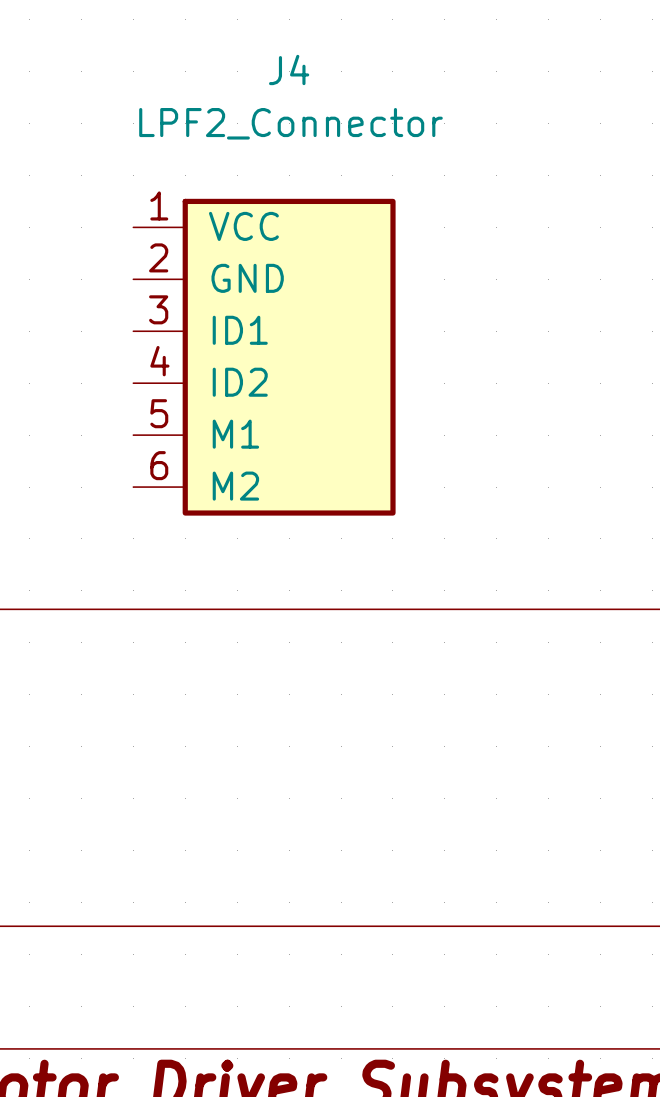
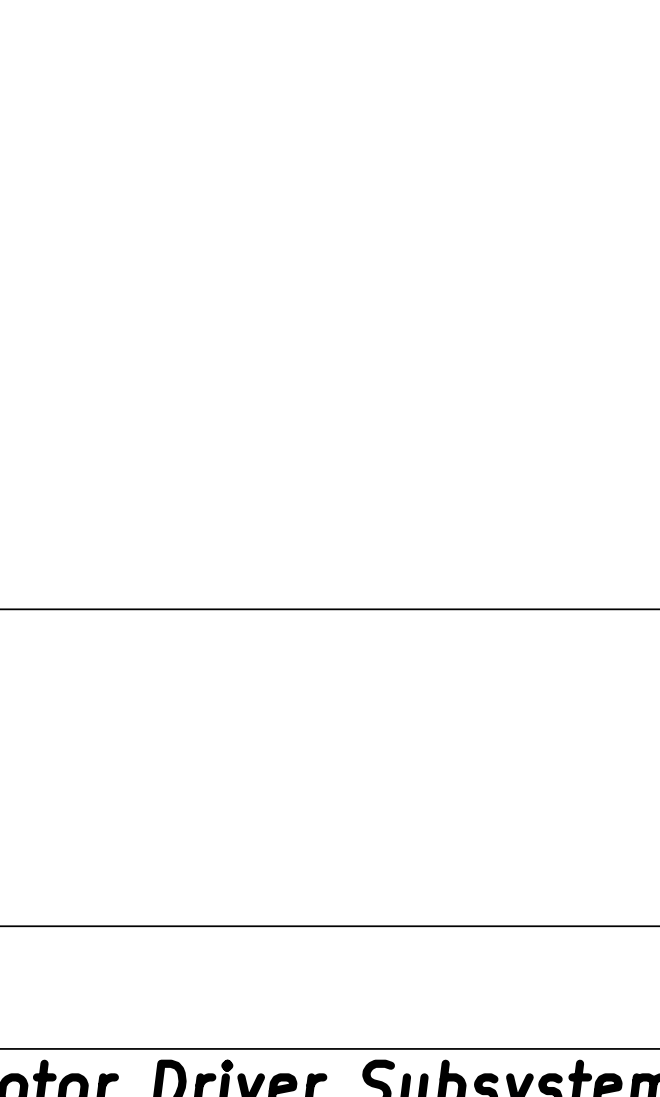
J4: LPF2_Connector (264, 357) -> none

